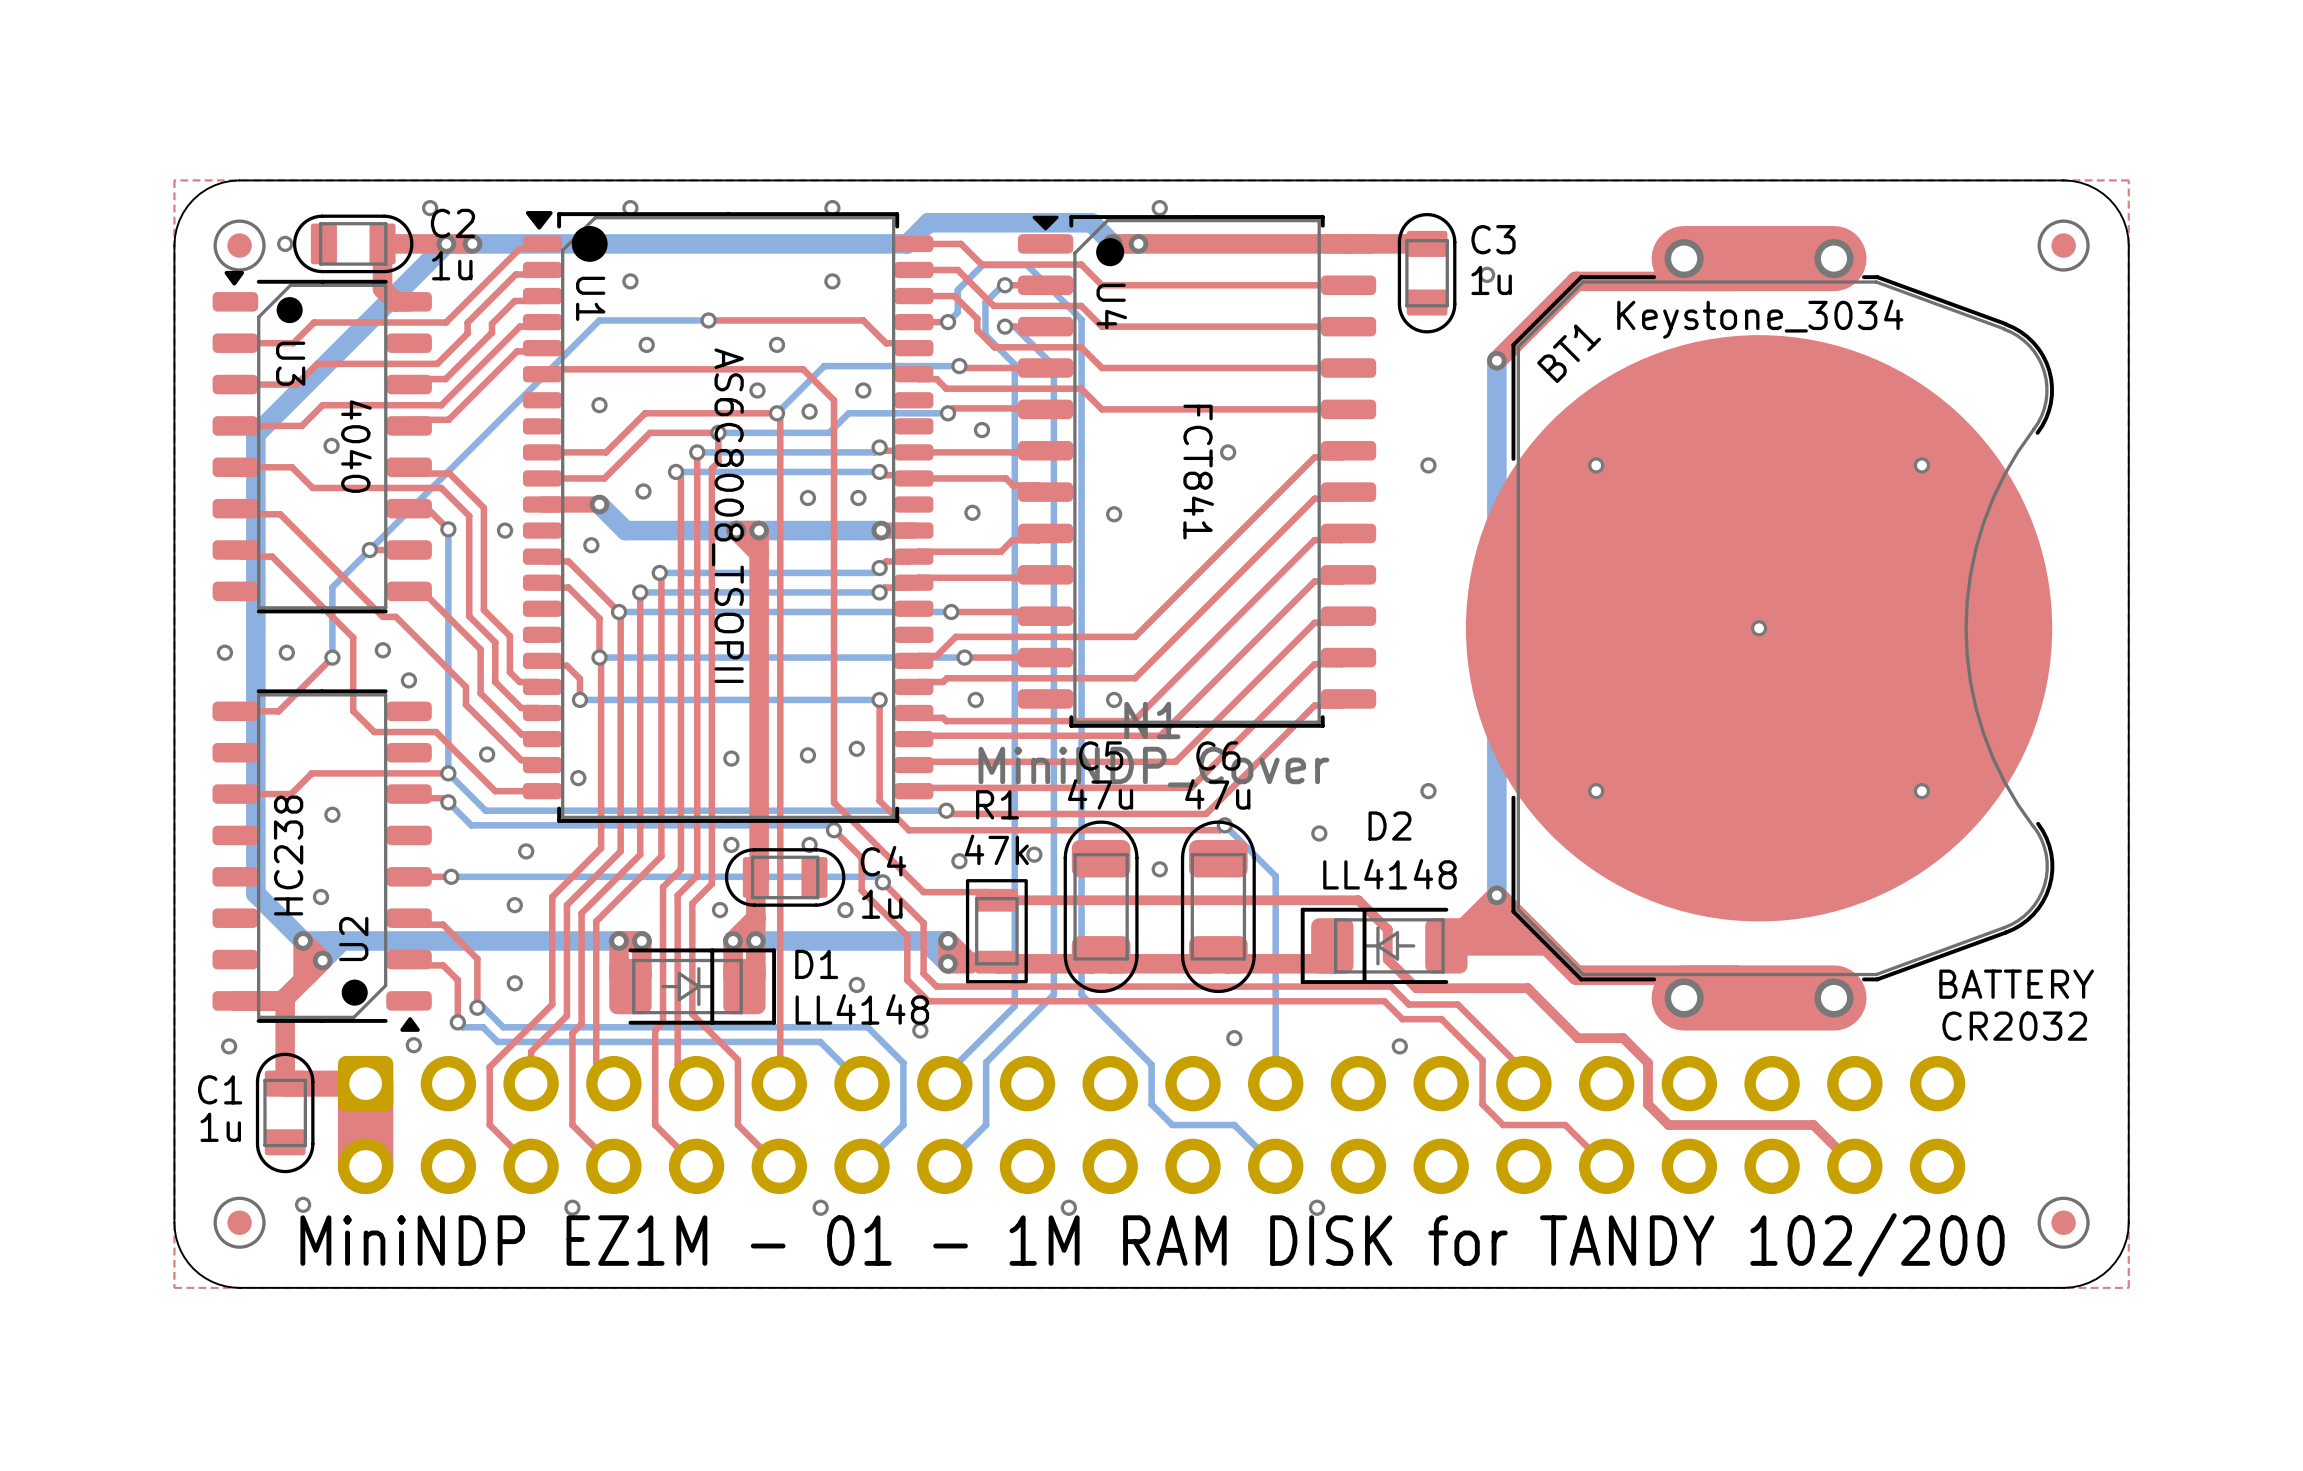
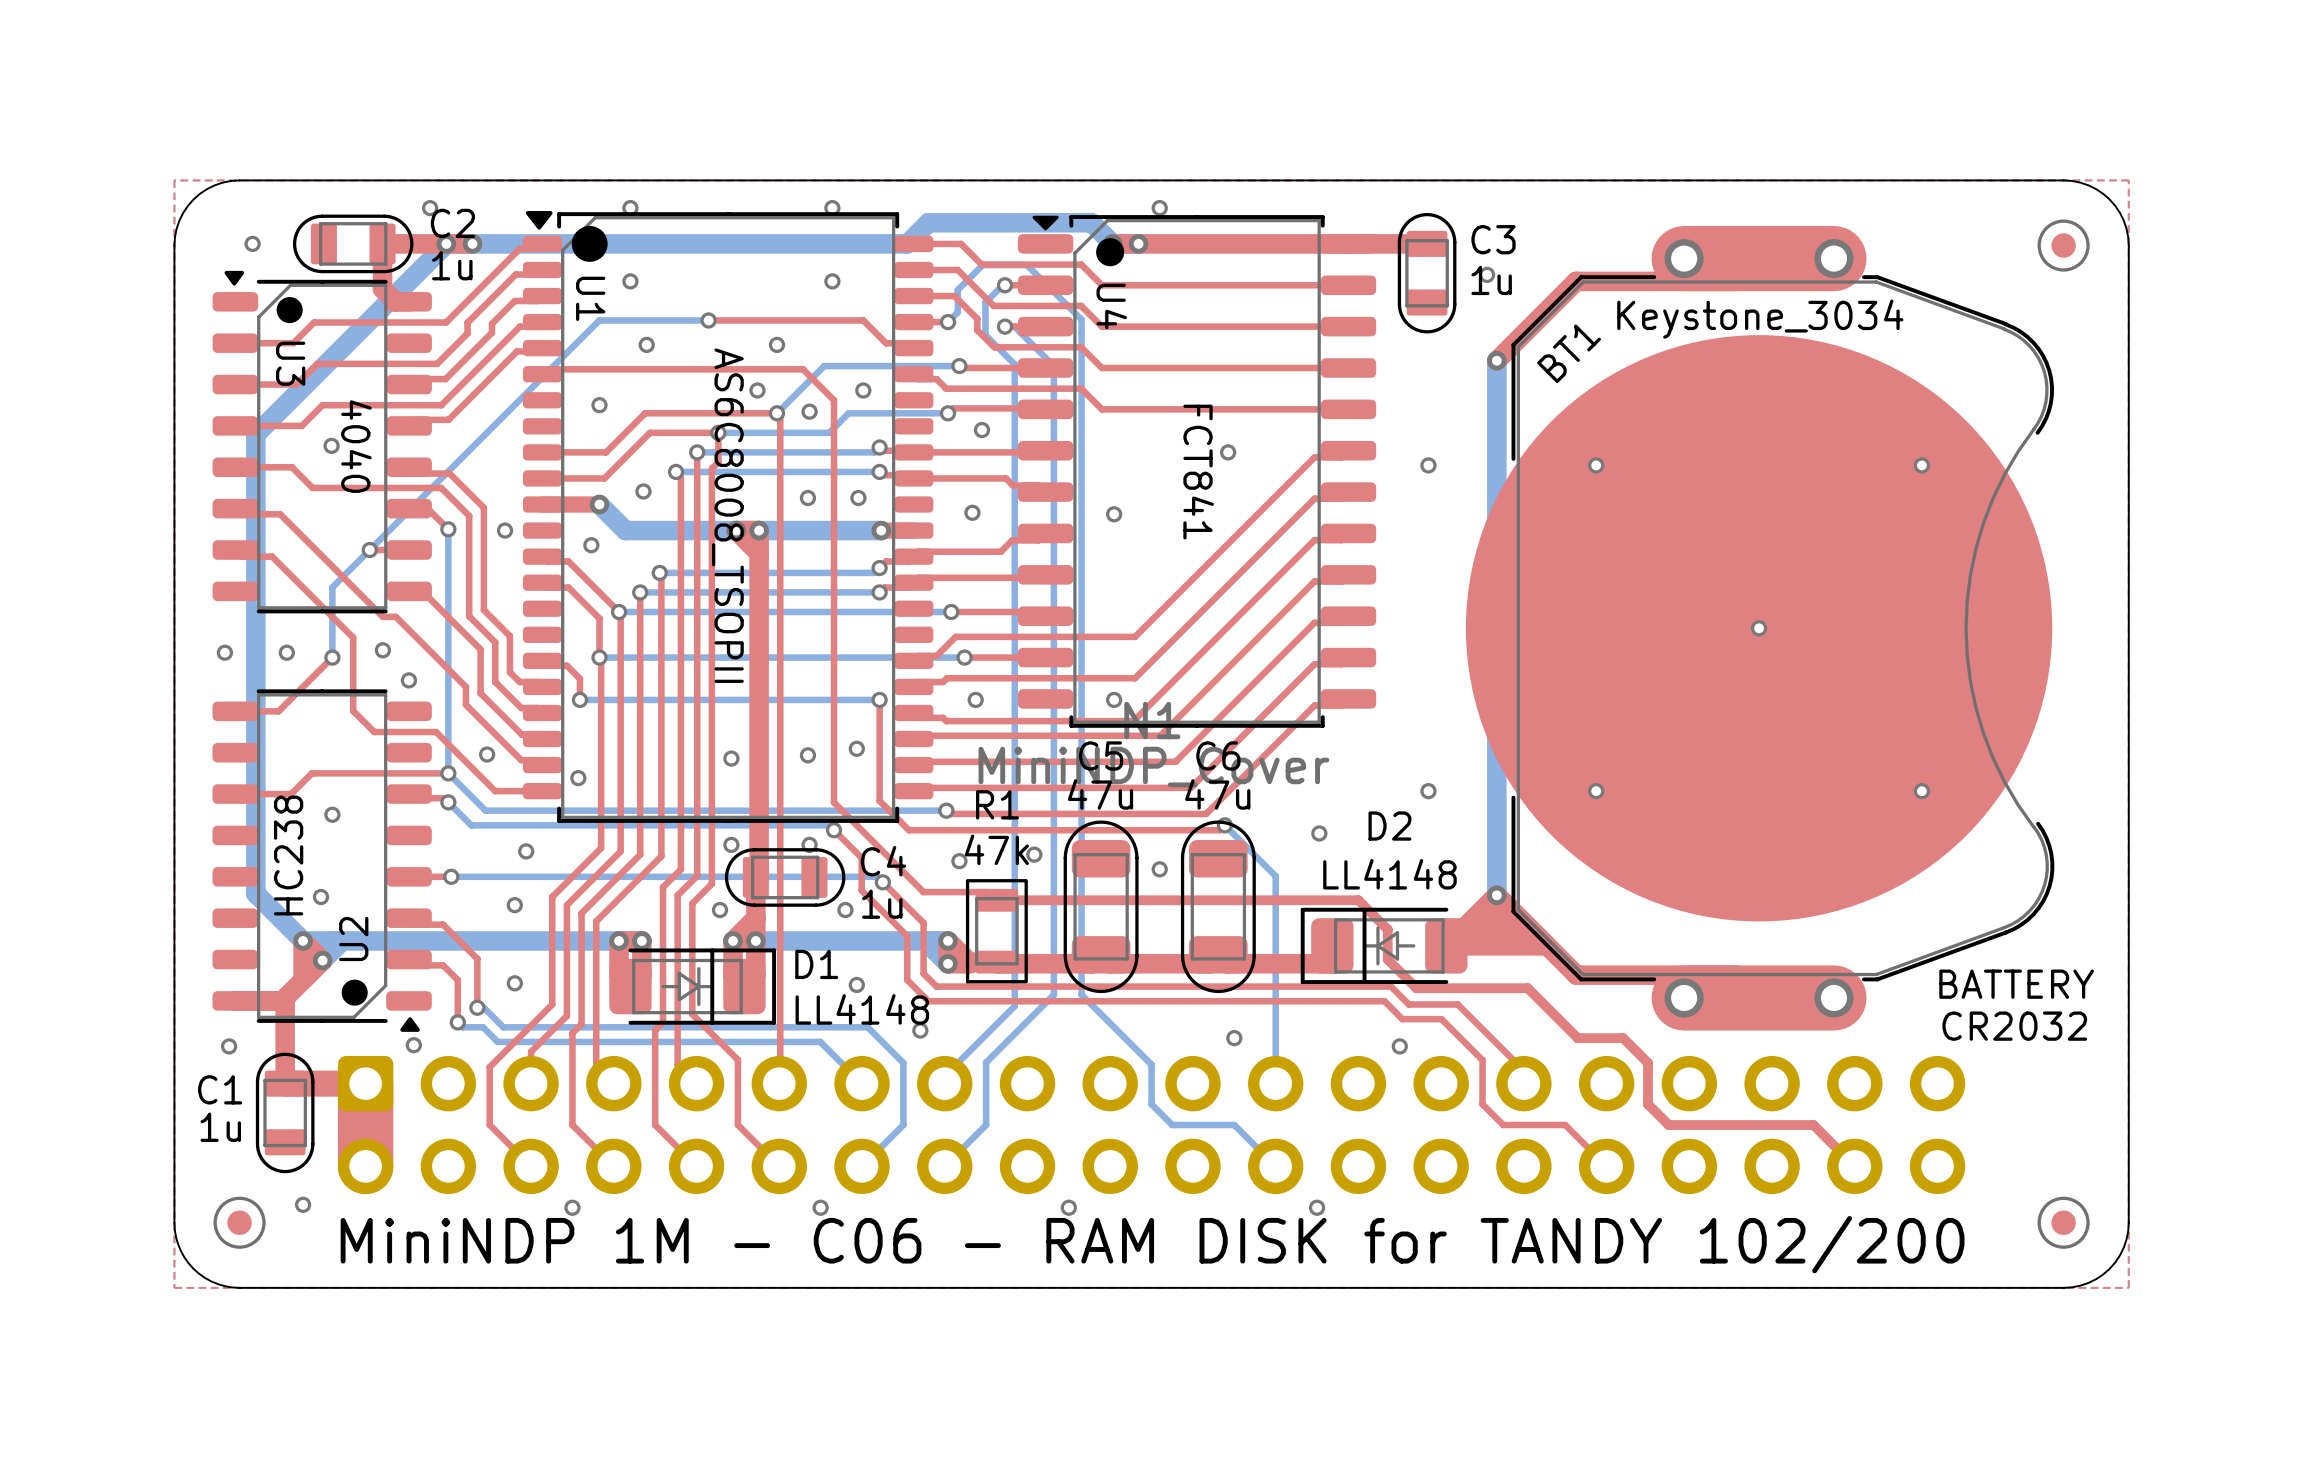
via position: (285, 243) -> (252, 243)
part: (239, 245) -> none
text: MiniNDP EZ1M - 01 - 1M RAM DISK for TANDY 102/200 (1152, 1244) -> MiniNDP 1M - C06 - RAM DISK for TANDY 102/200 (1152, 1244)

